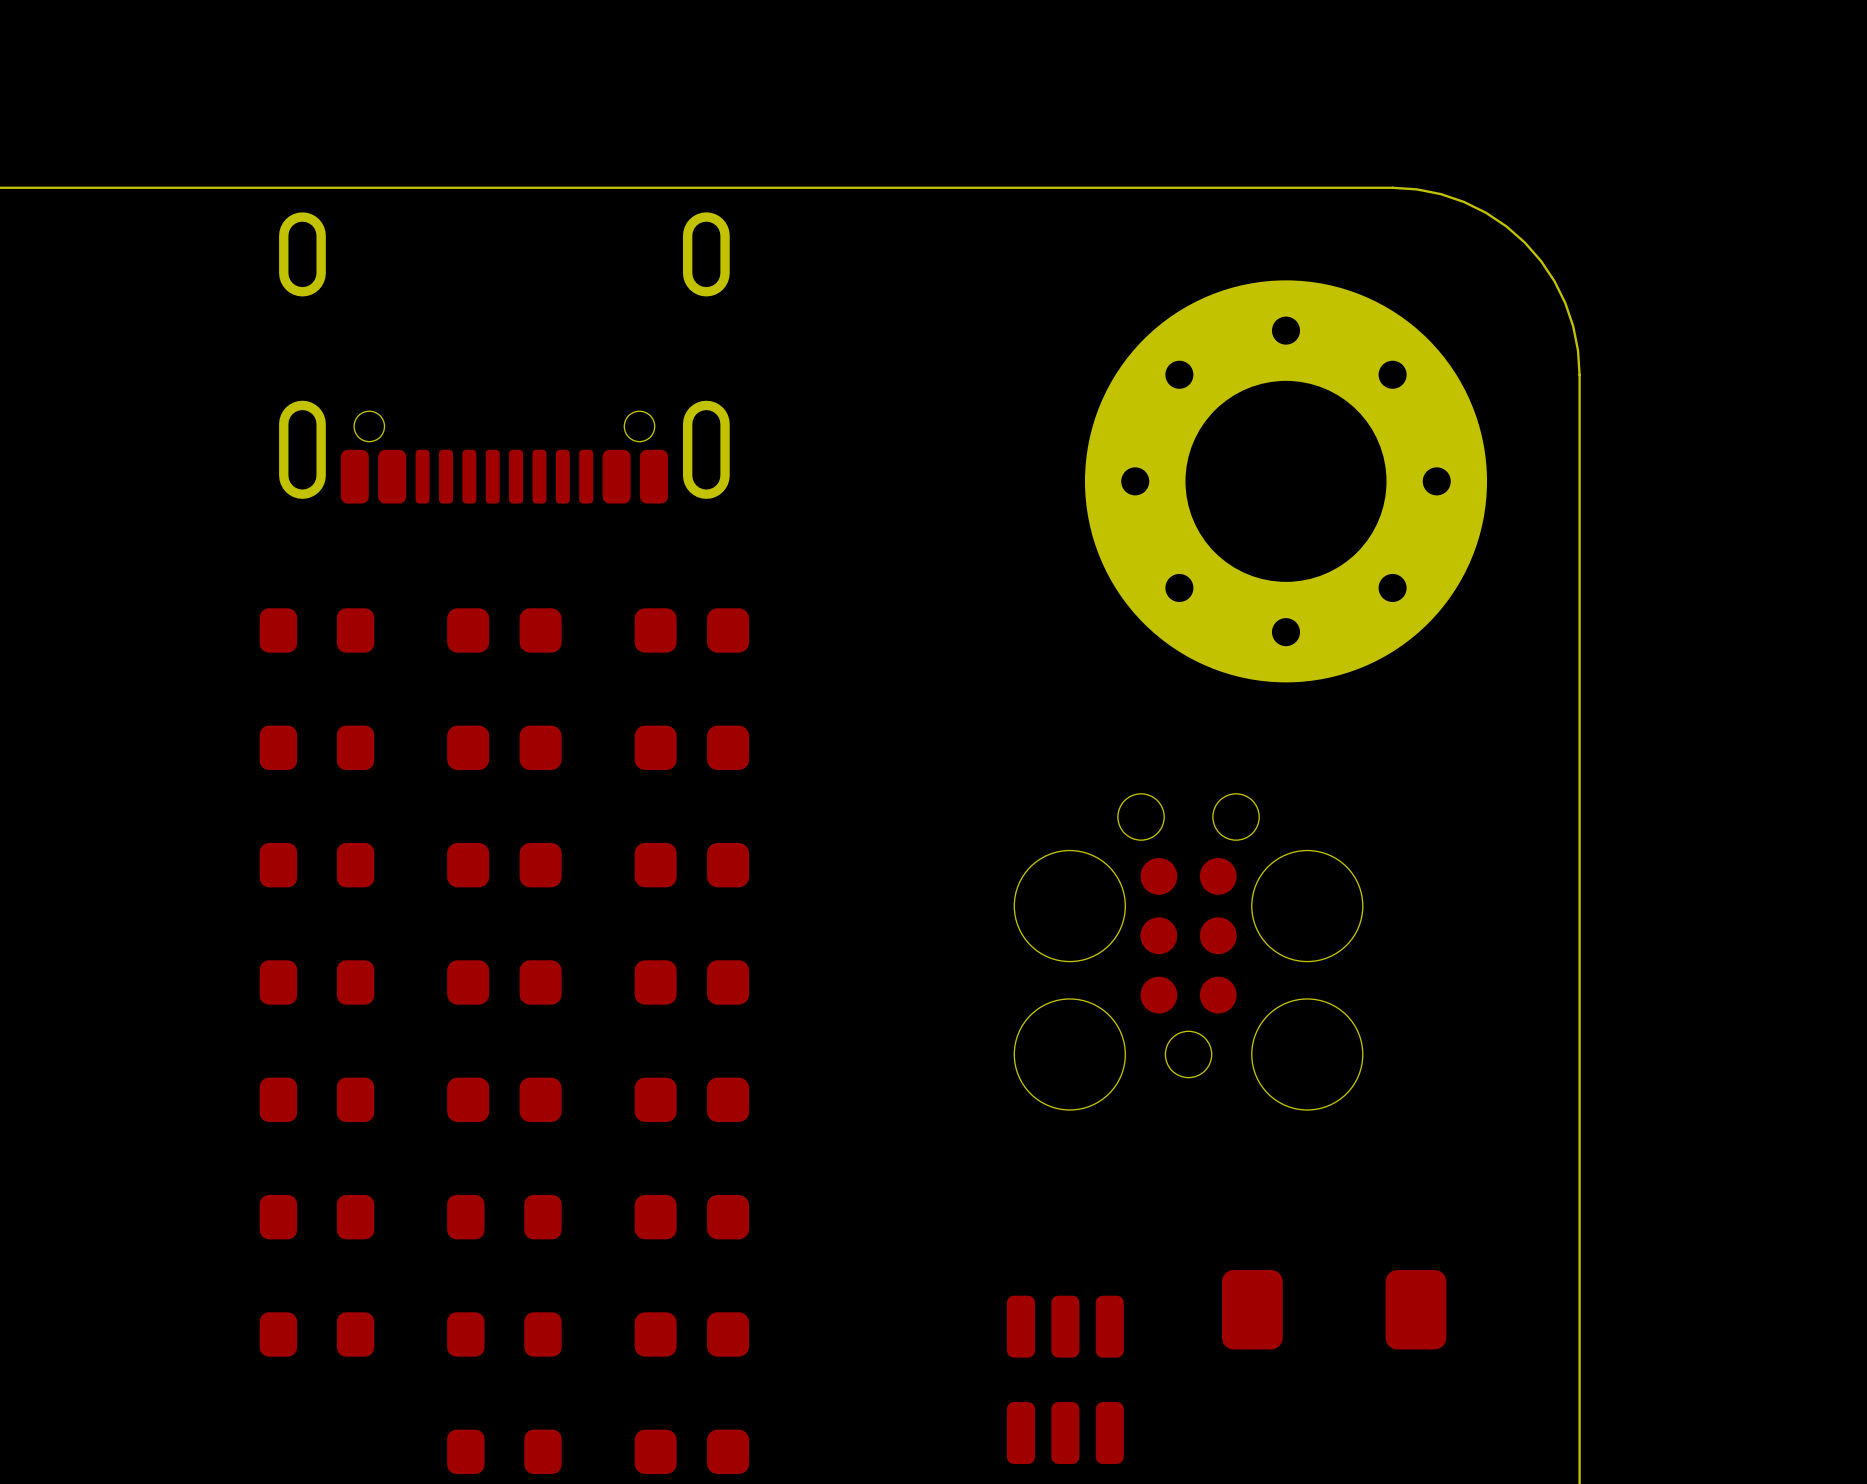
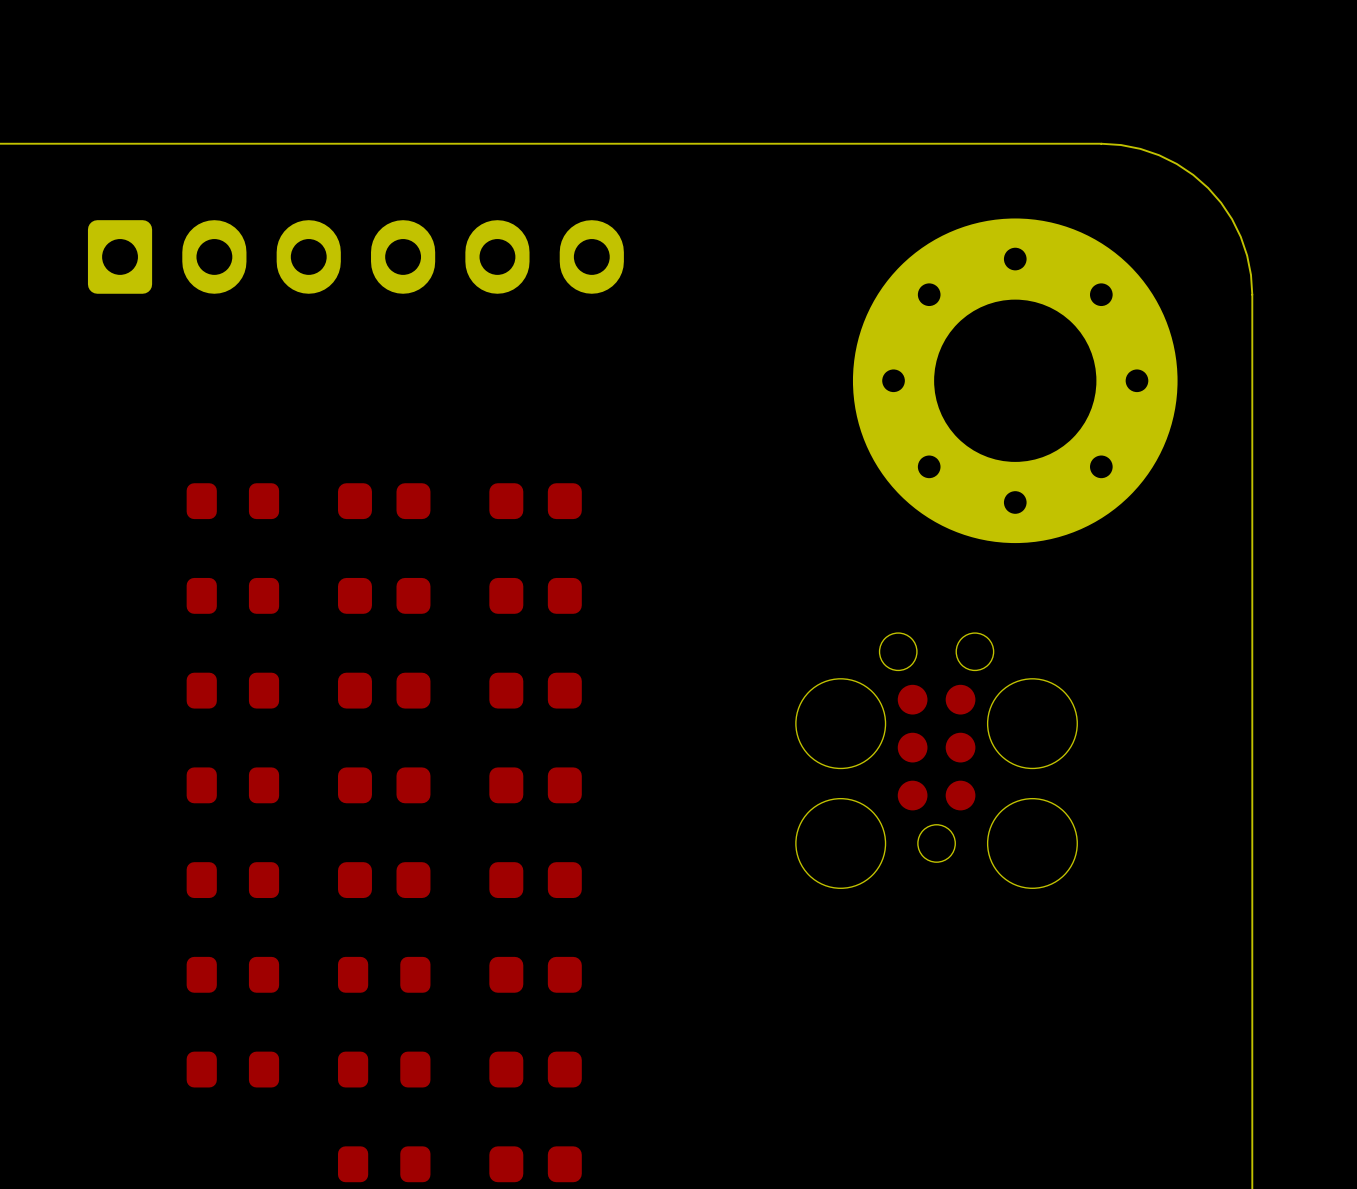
part footprint: [279, 212, 730, 504] -> [87, 220, 624, 294]
part: (1334, 1309) -> none
part: (1065, 1379) -> none

